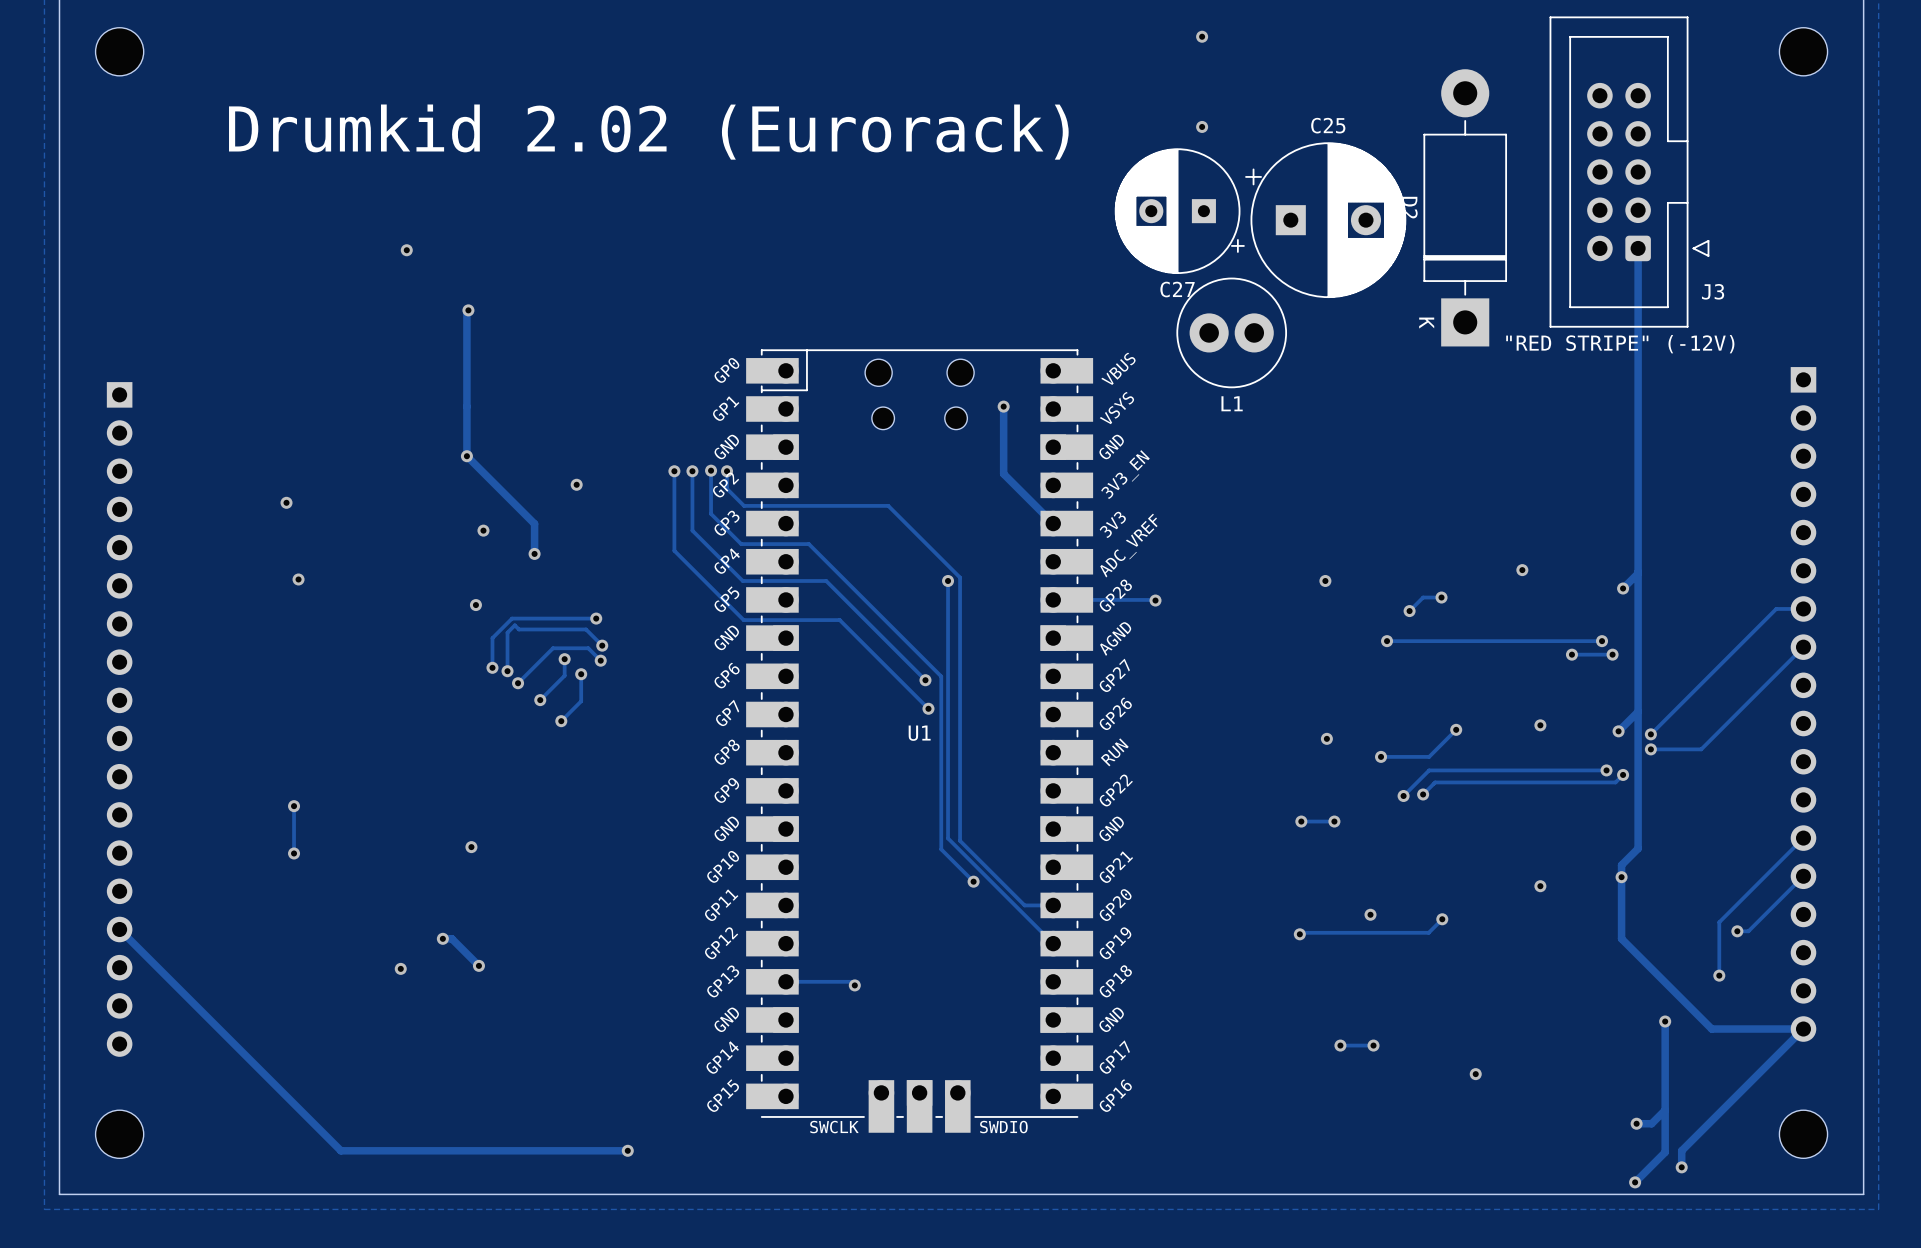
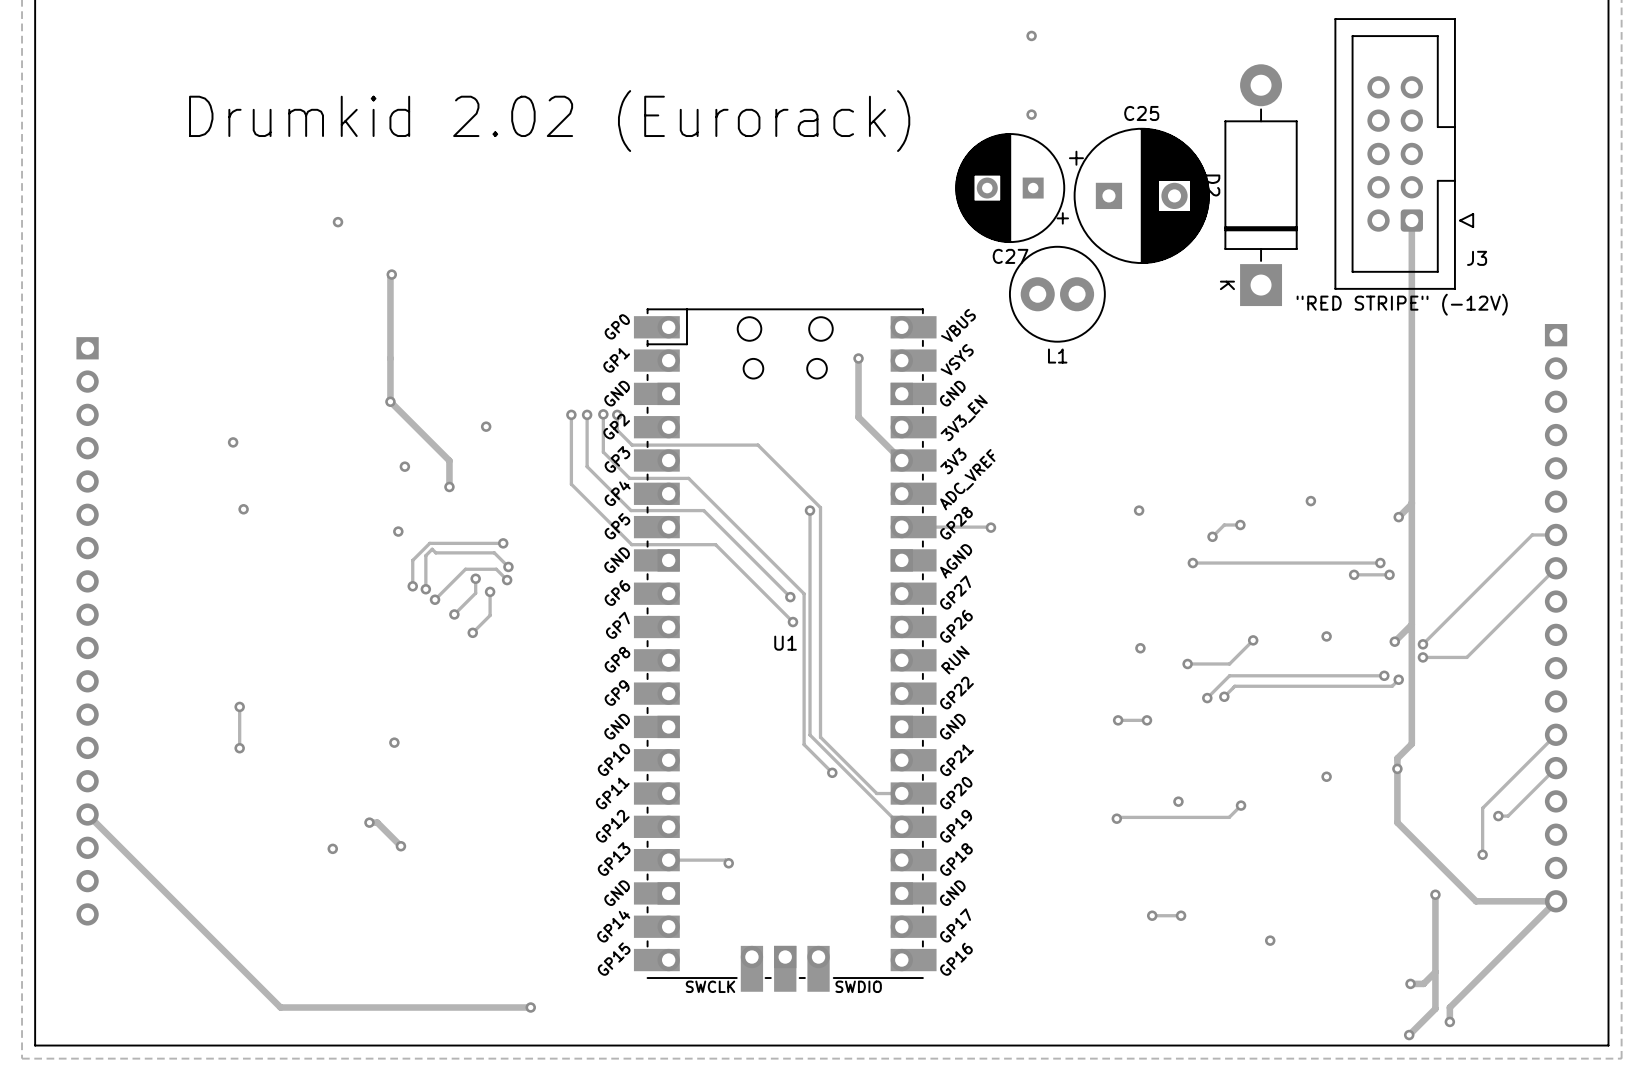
part: (119, 51) -> none
part: (1803, 51) -> none
part: (119, 1134) -> none
part: (1803, 1134) -> none

